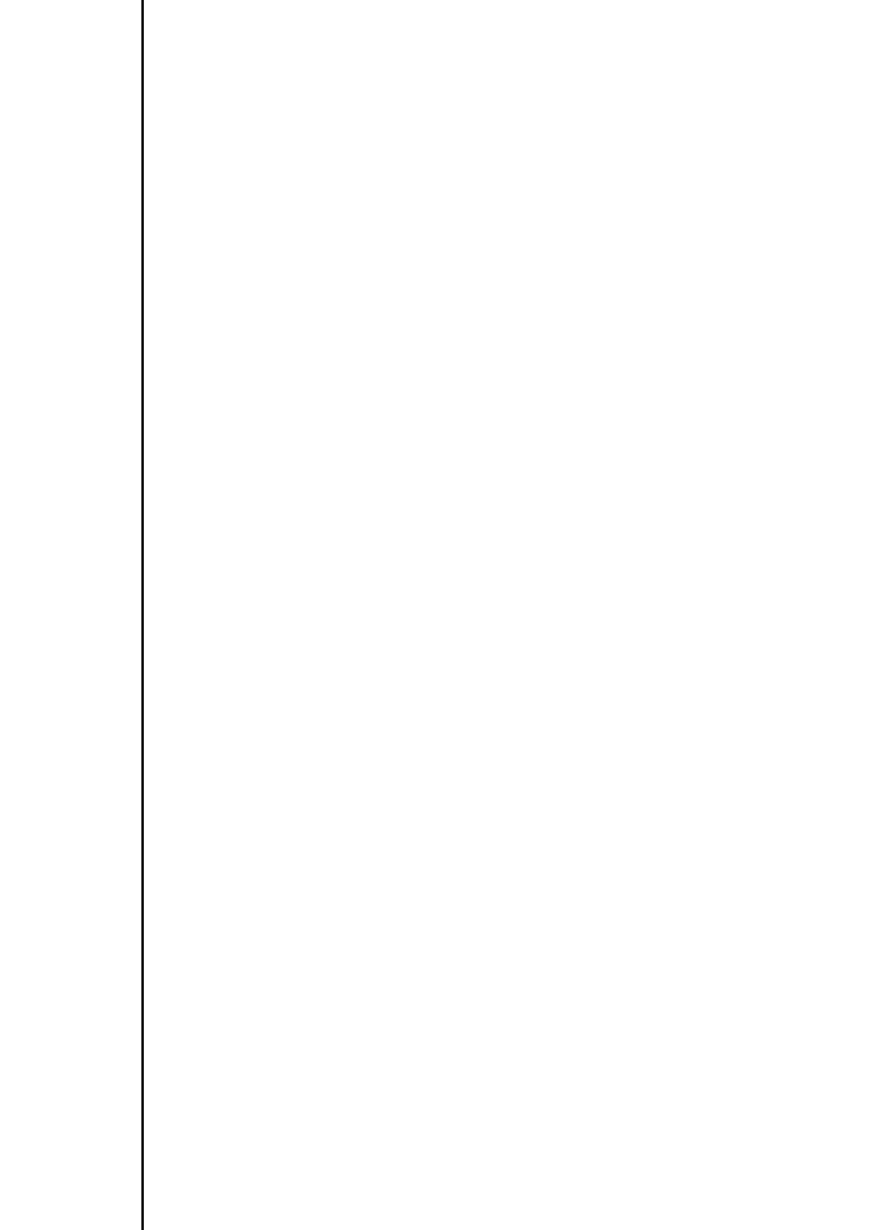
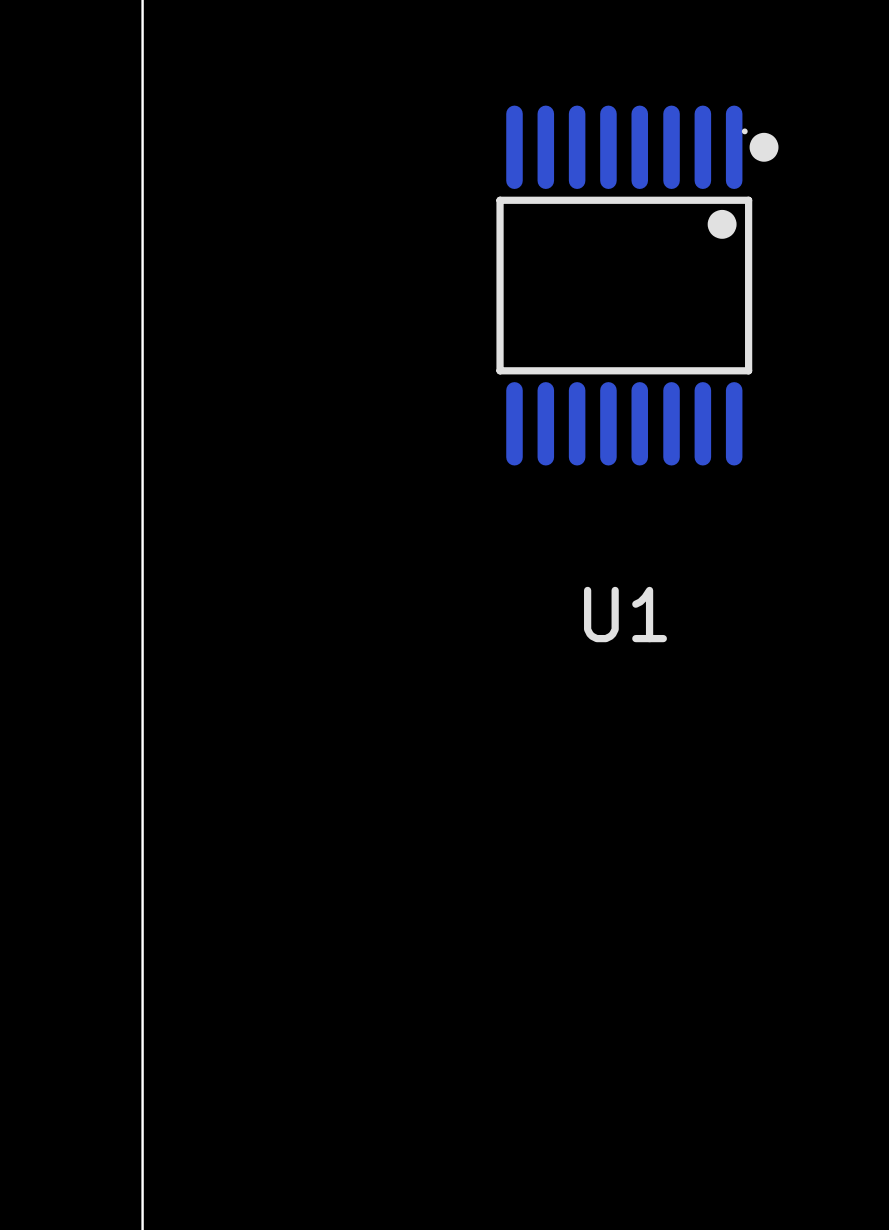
U1: none -> (637, 285)

